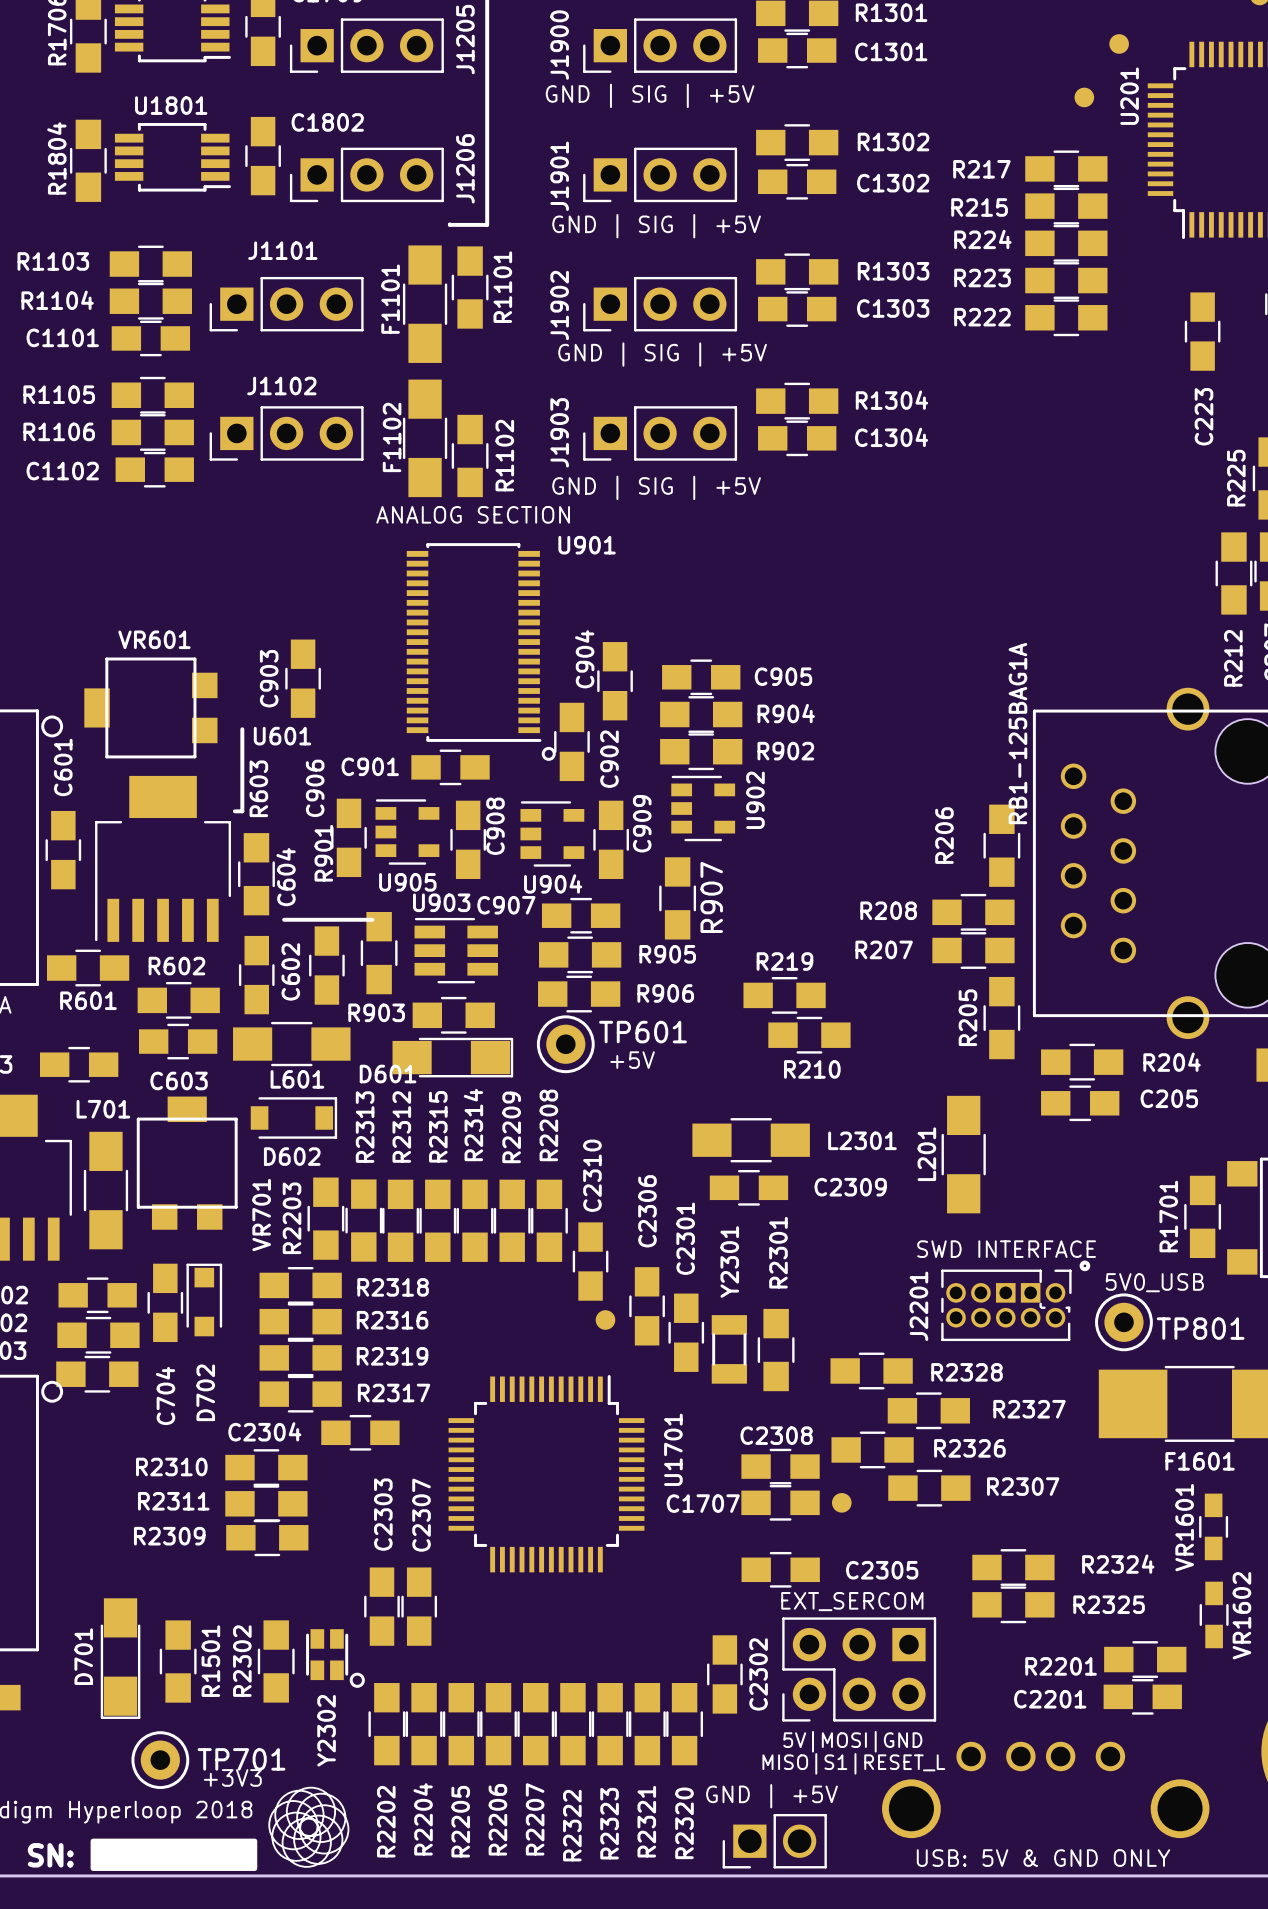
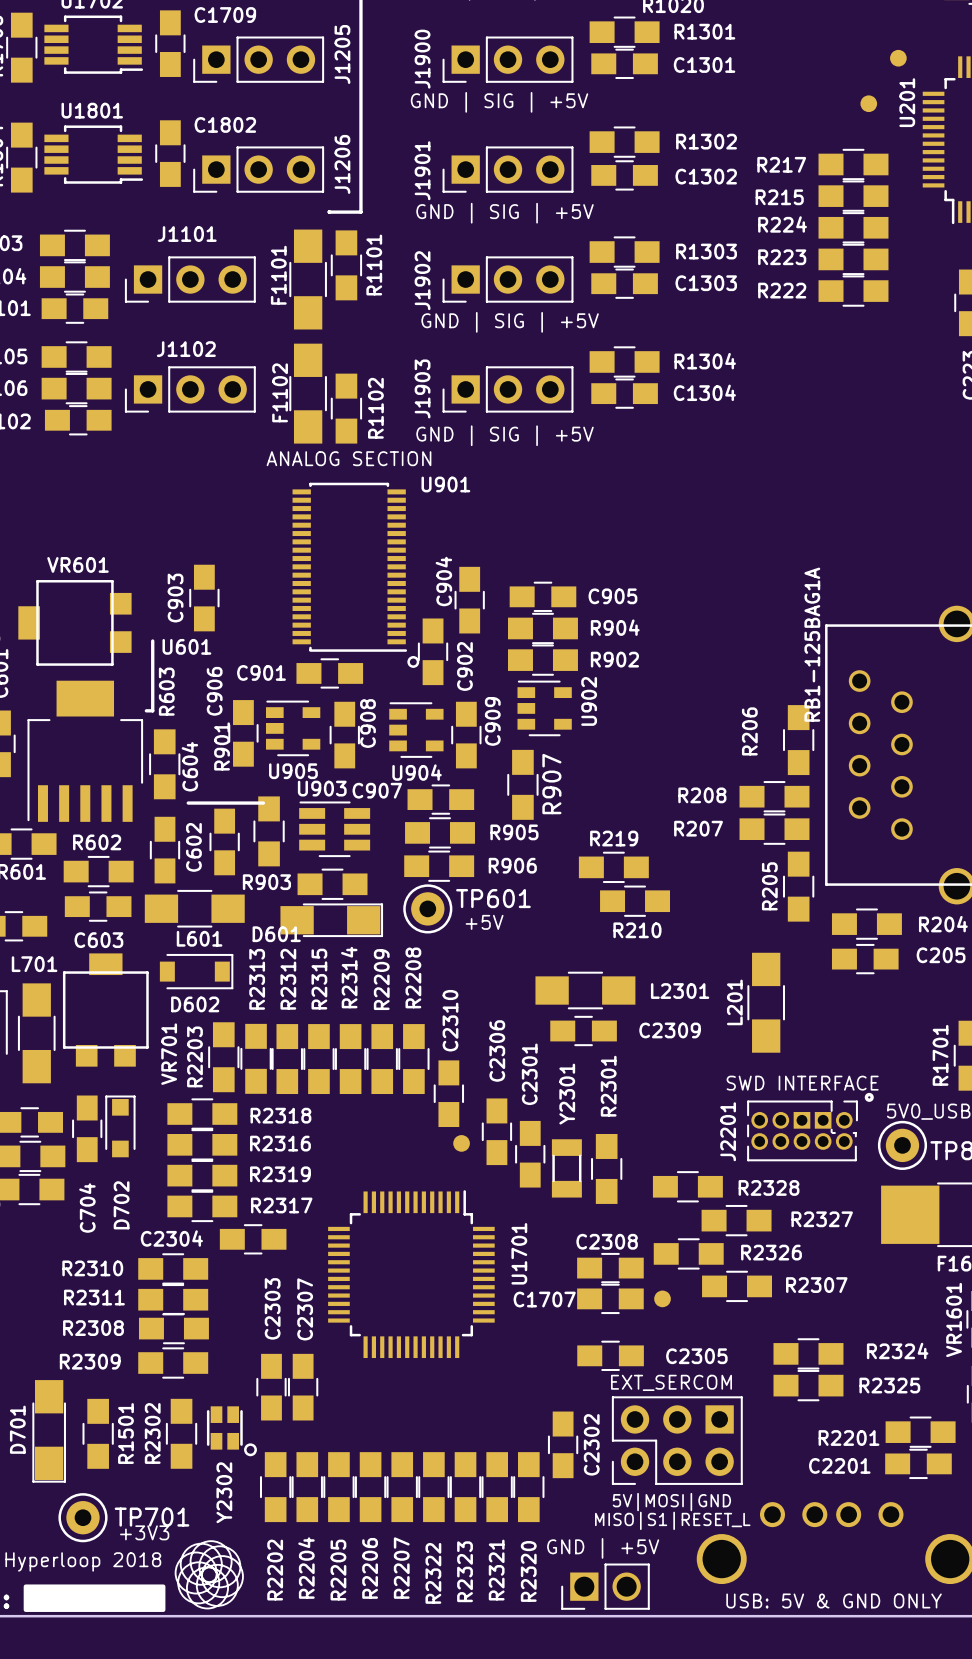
R2309 name: R2309 (169, 1536) -> R2308 (93, 1328)
R2309: none -> (173, 1363)

